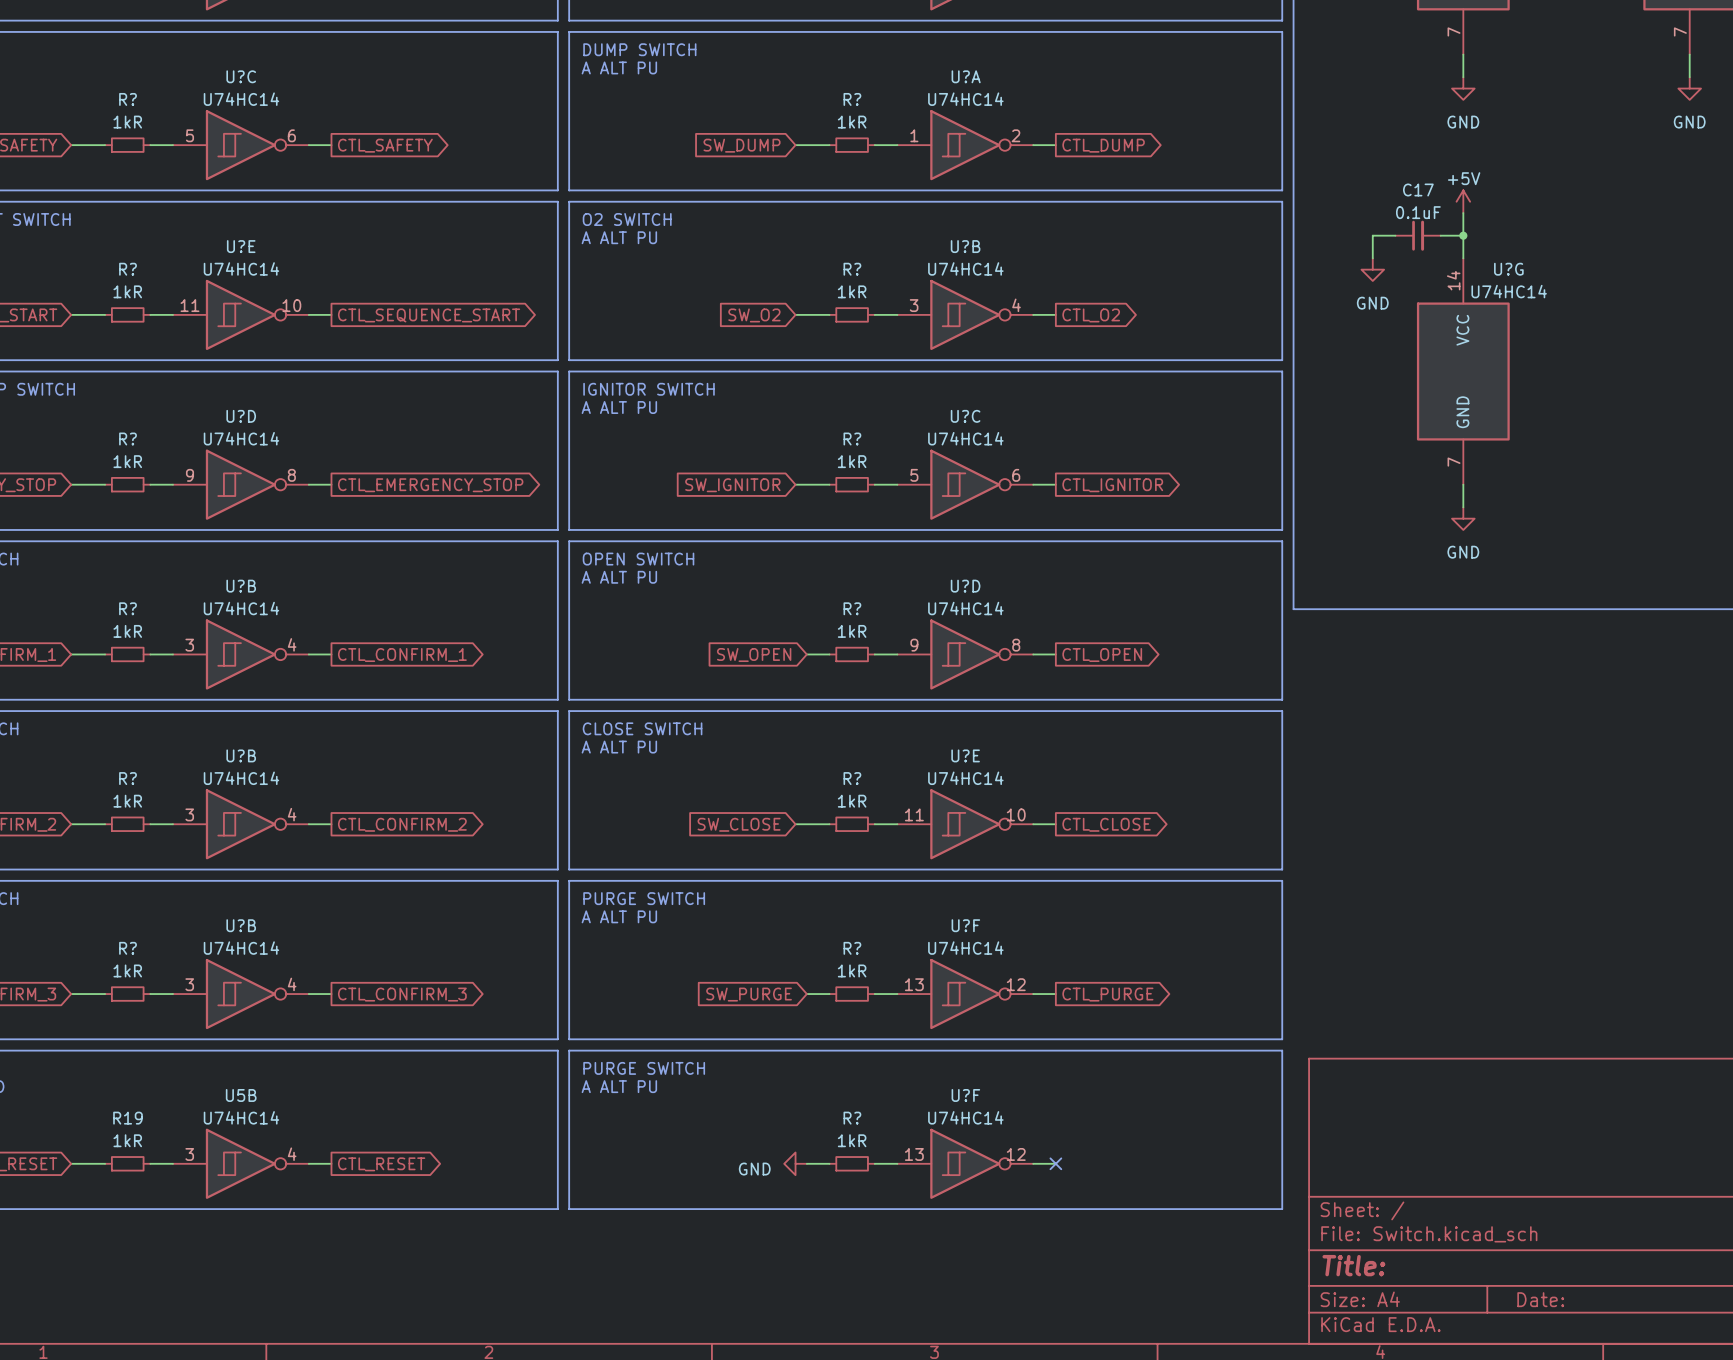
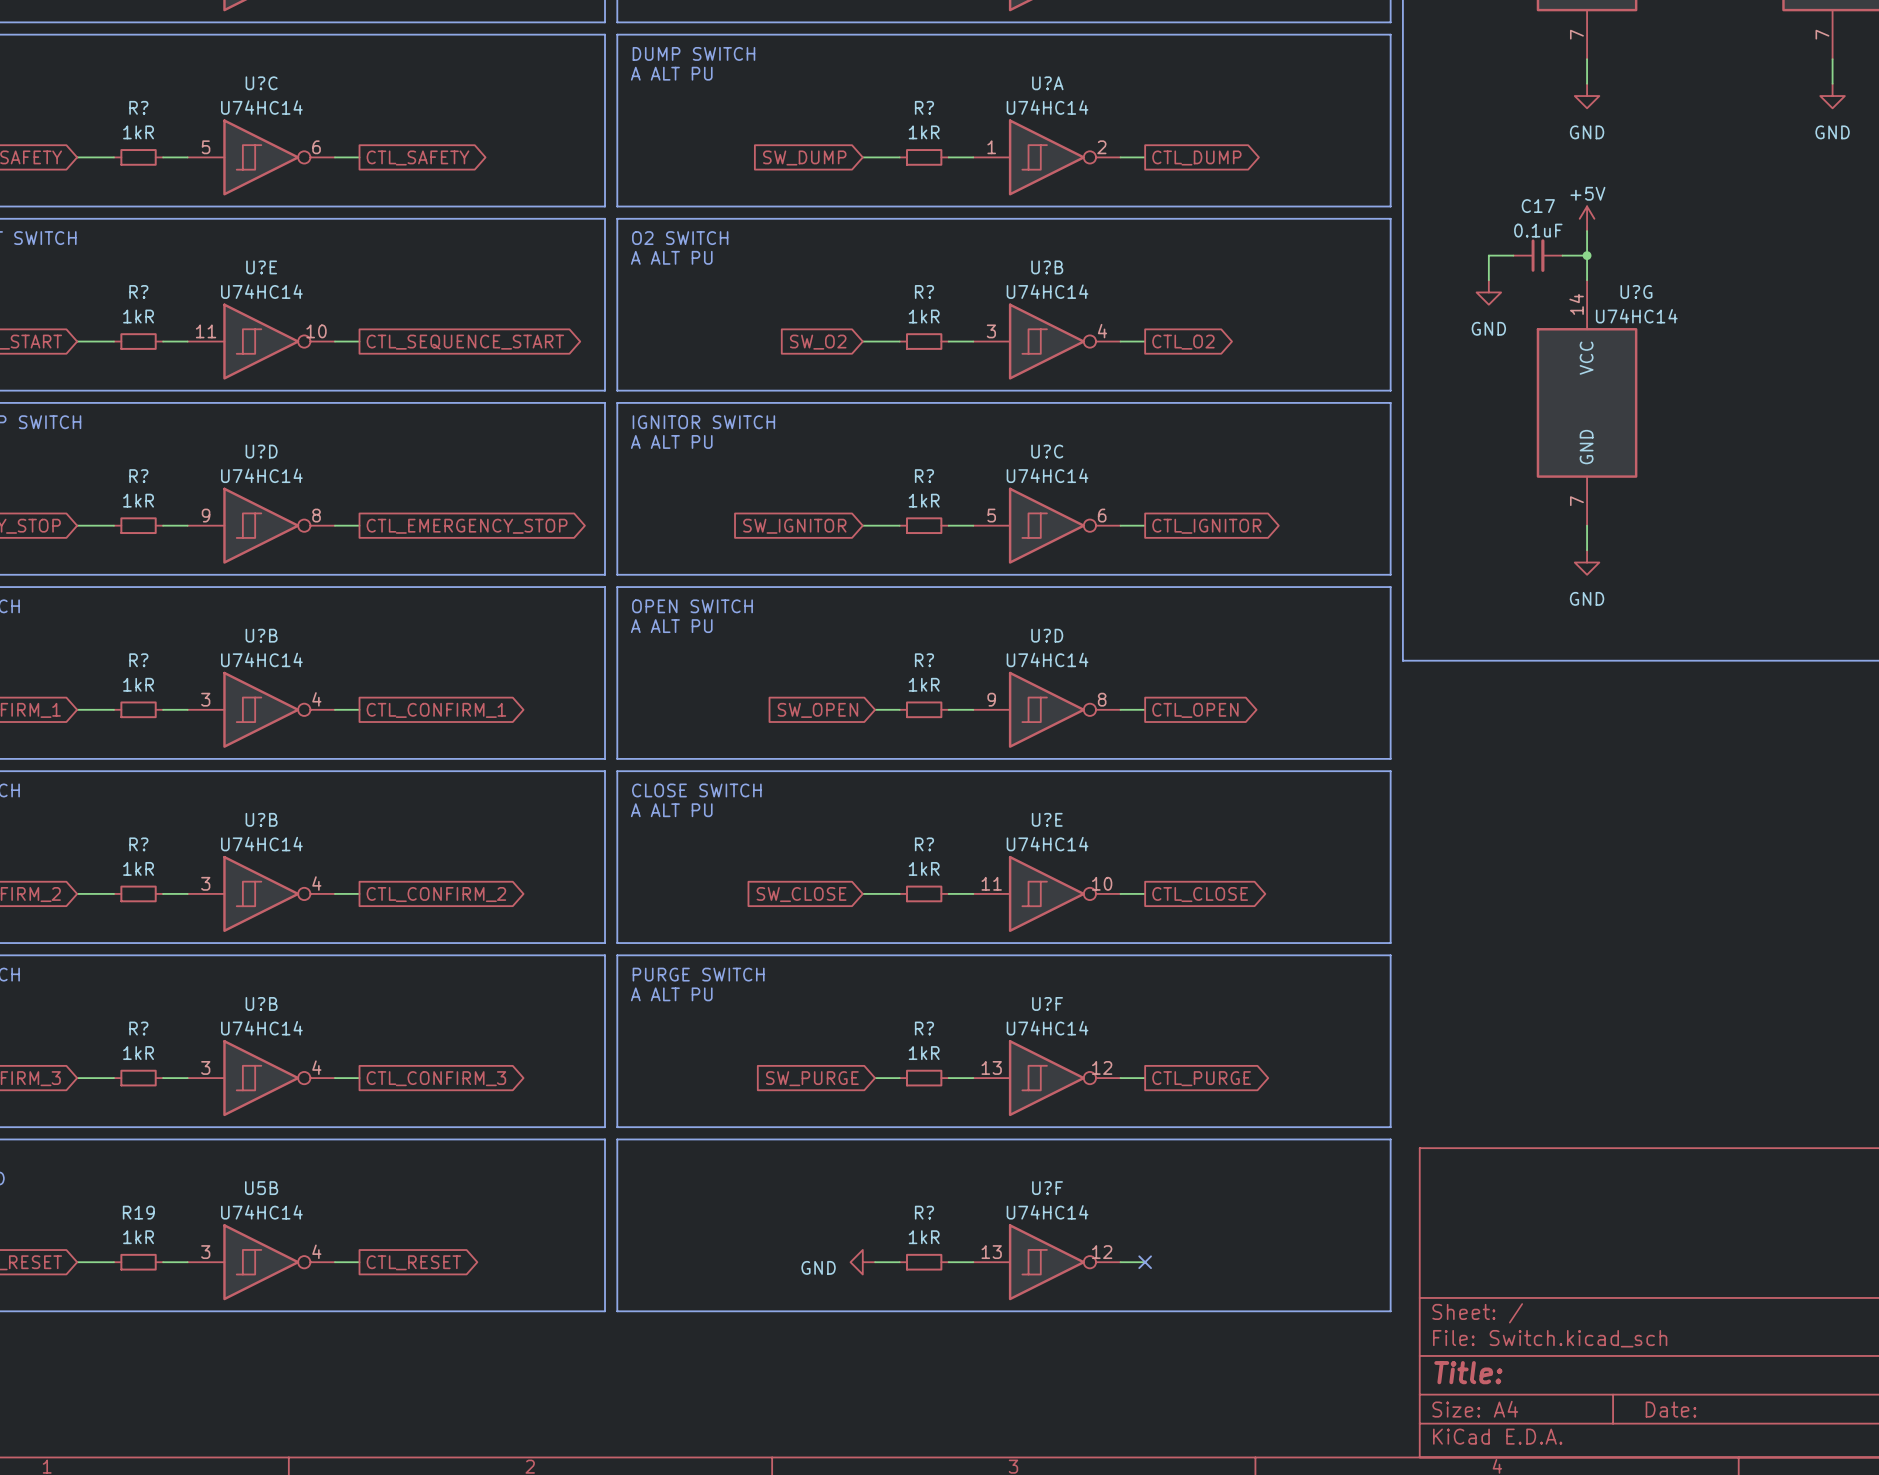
text: PURGE SWITCH (644, 1068) -> none
text: A ALT PU (619, 1086) -> none

